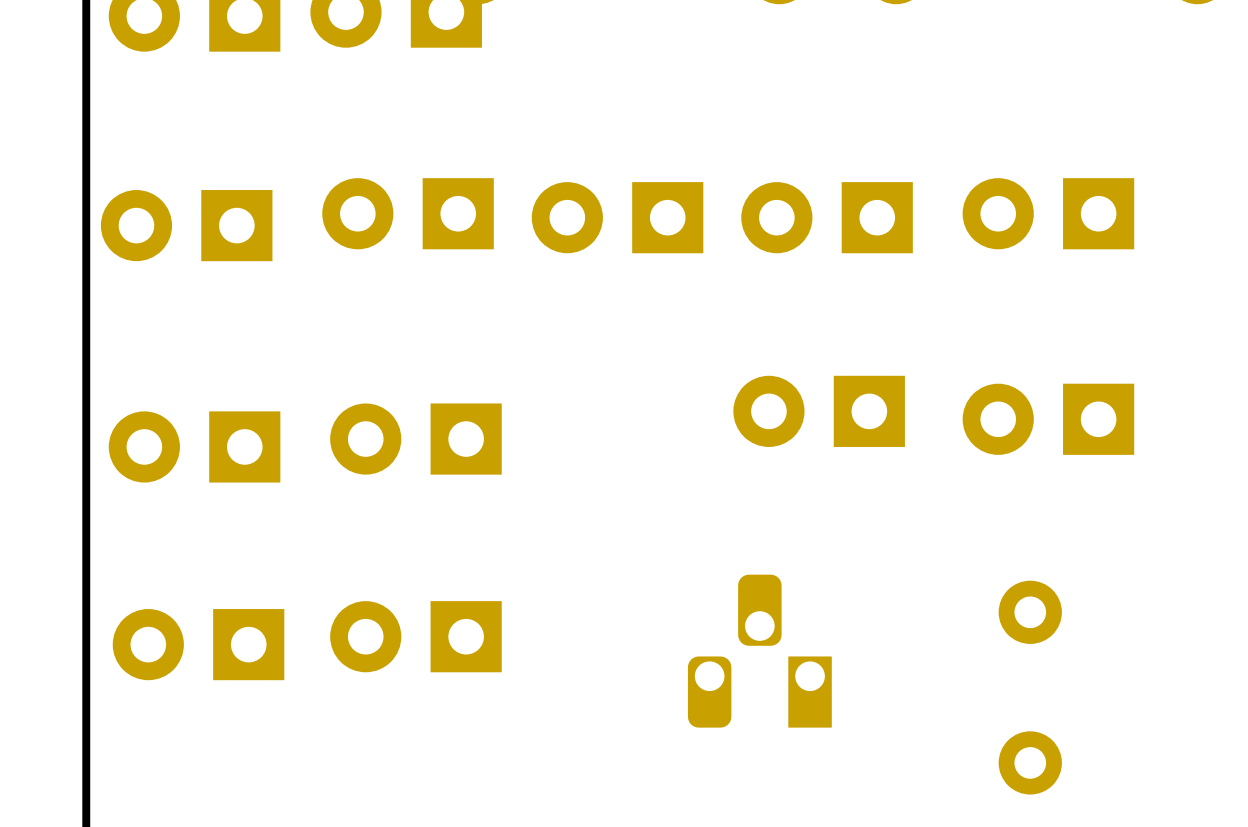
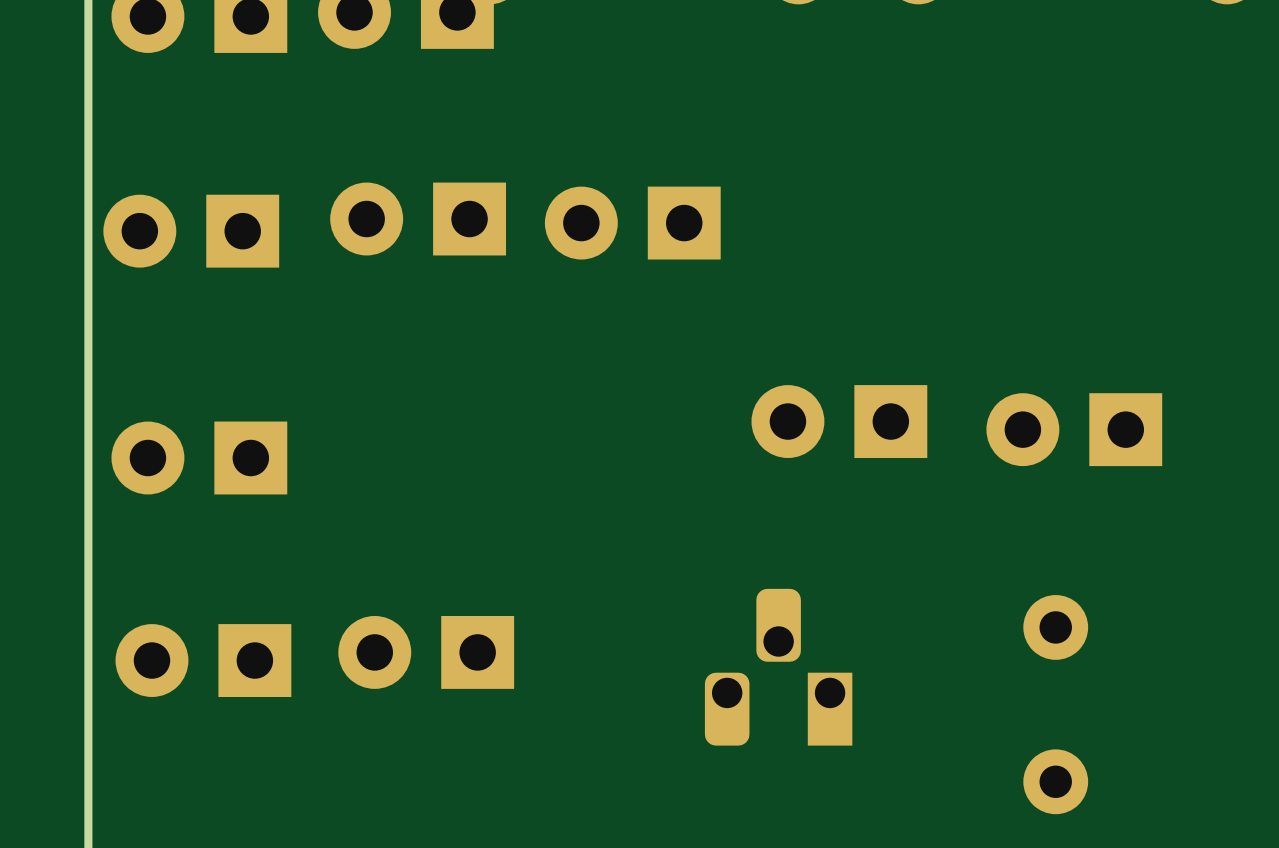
part: (1048, 213) -> none
part: (827, 217) -> none
part: (415, 439) -> none

